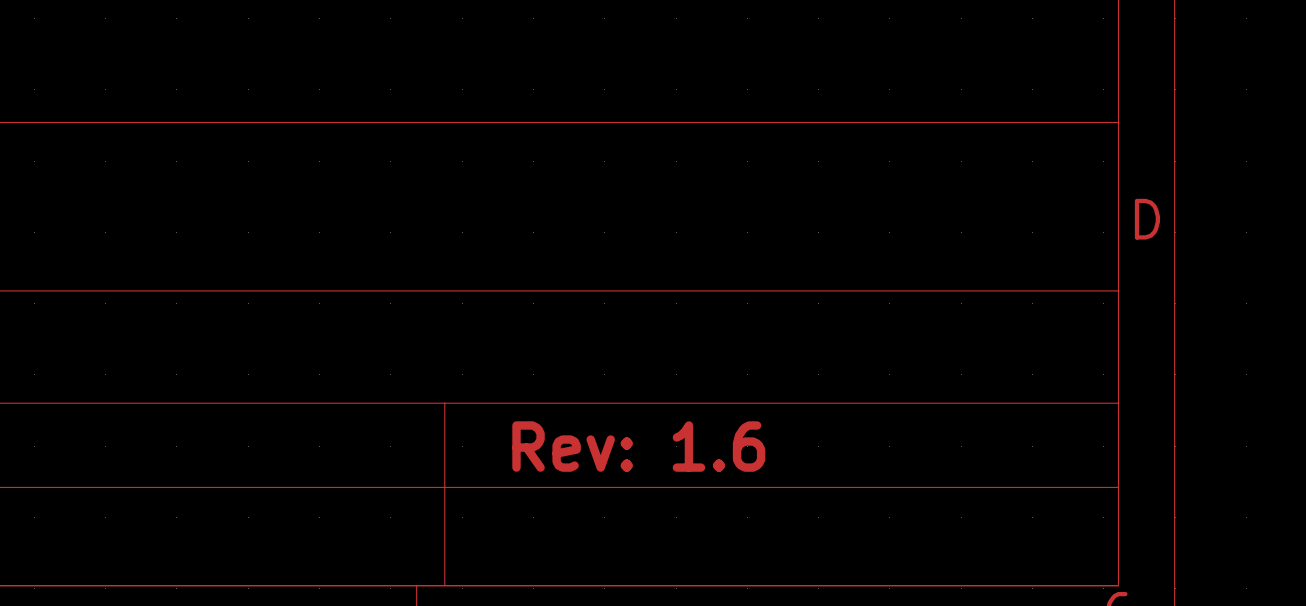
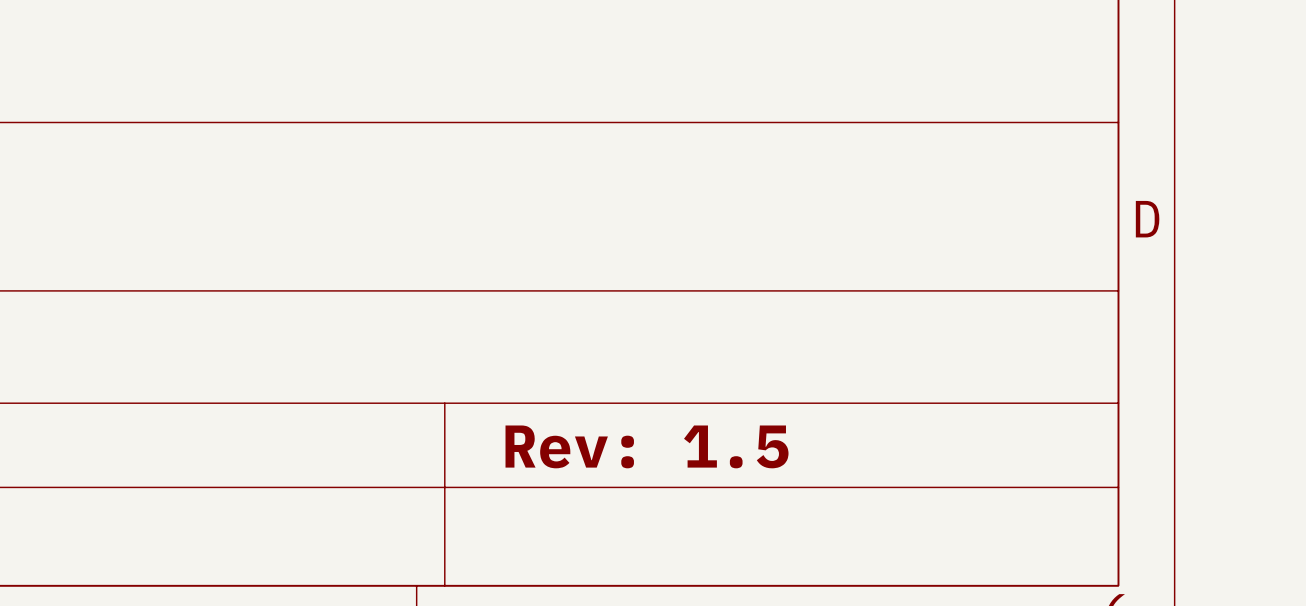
title block: Rev: 1.6 (638, 446) -> Rev: 1.5 (647, 446)

